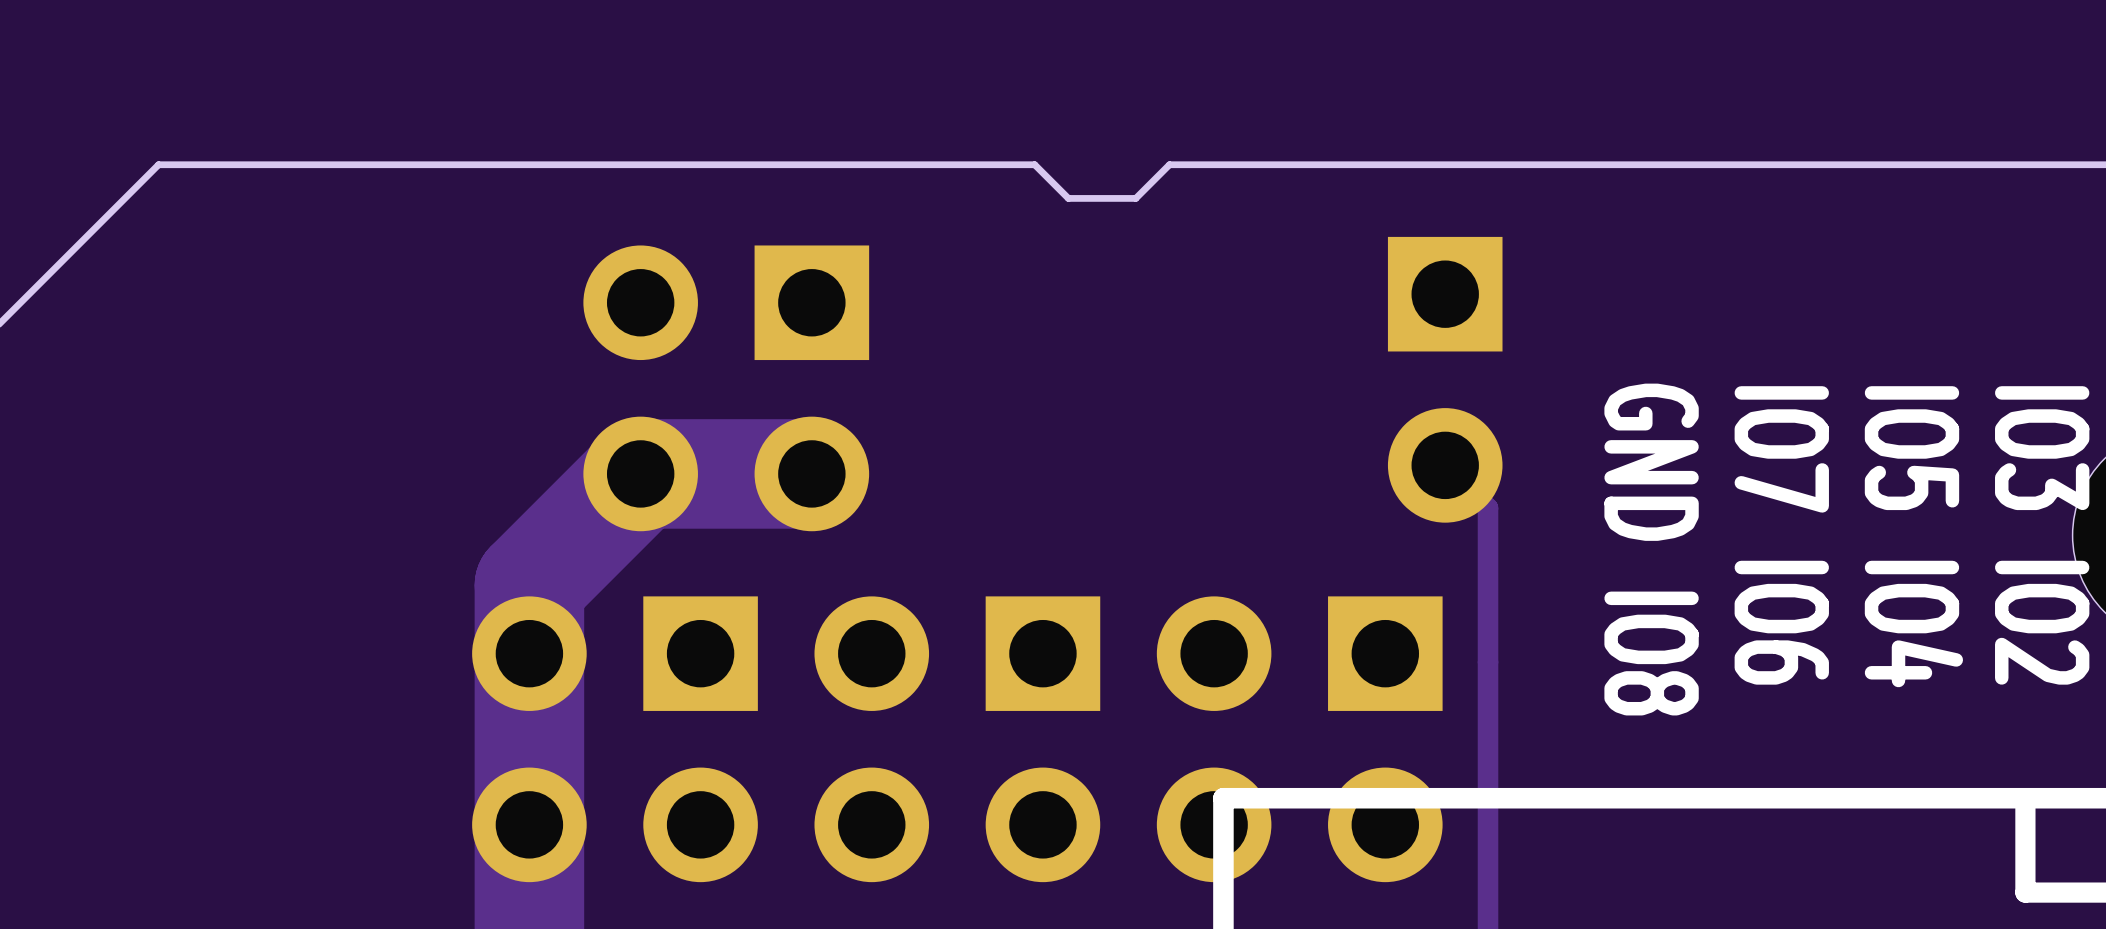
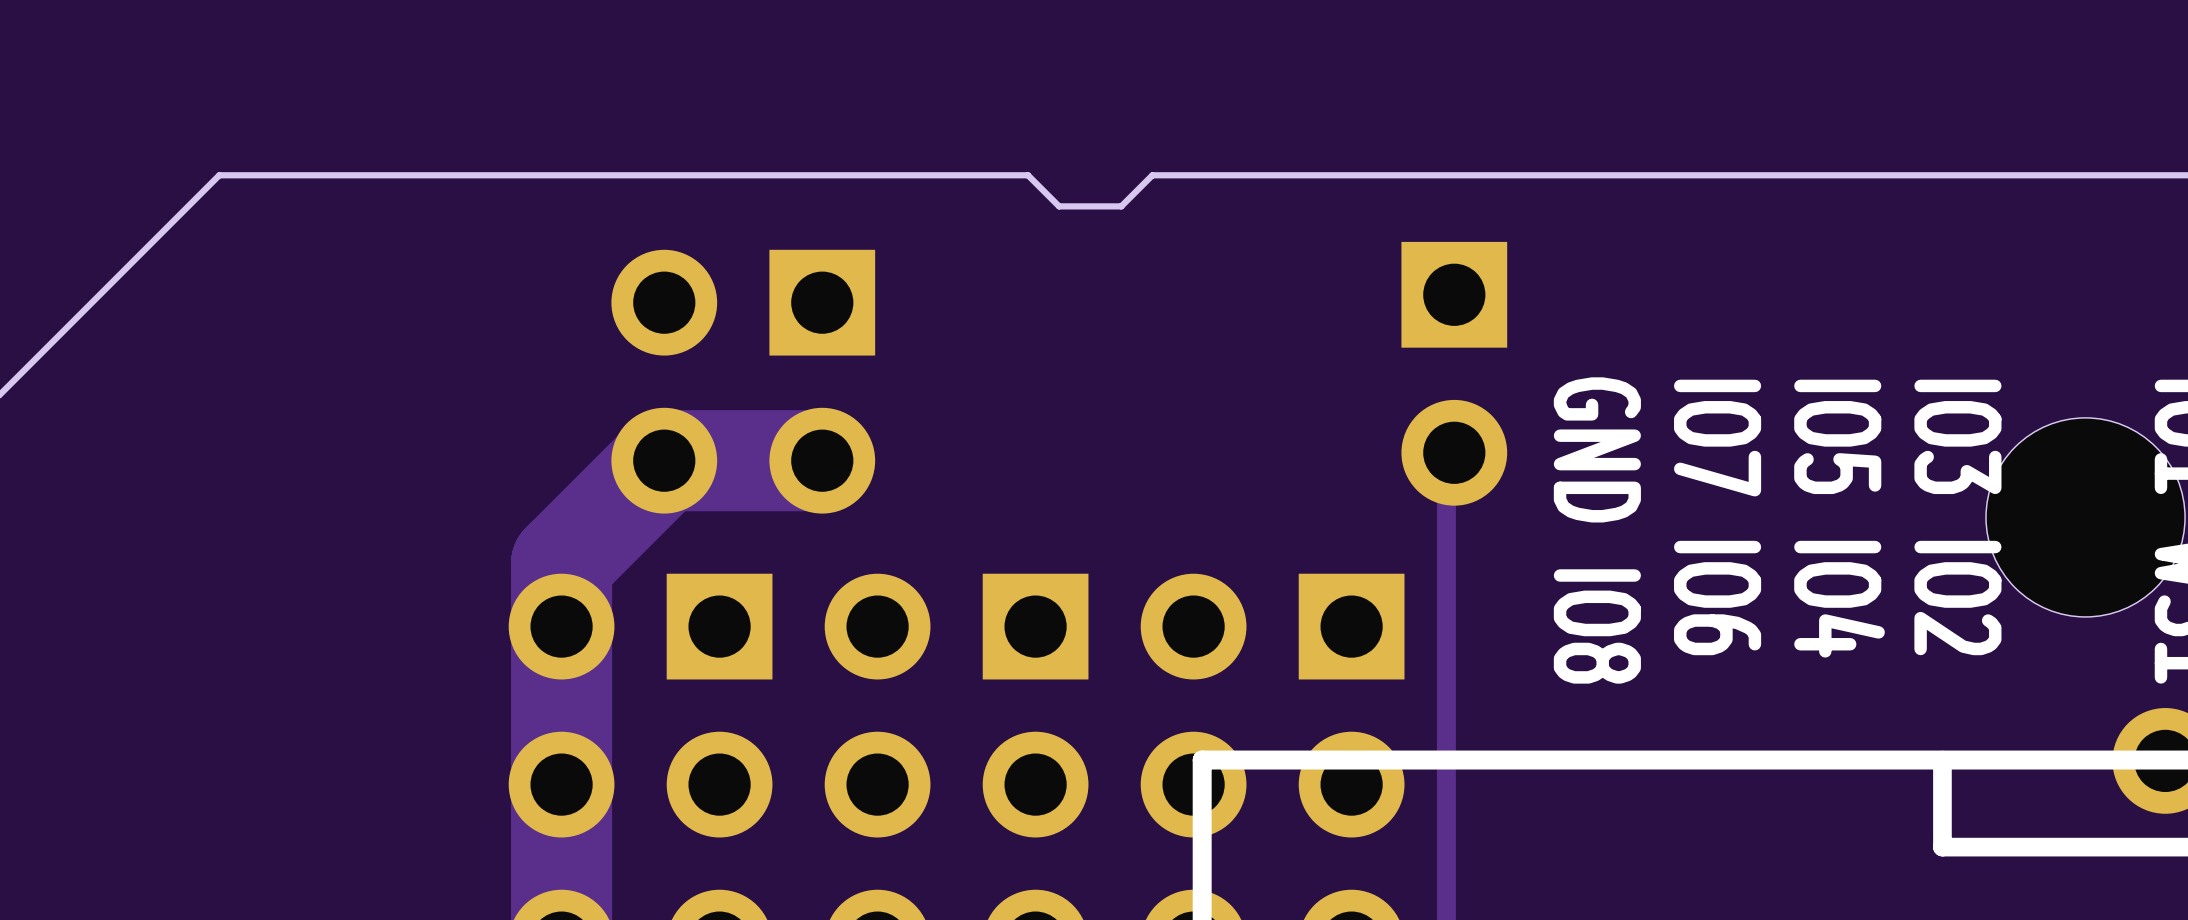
part position: (1445, 379) -> (1454, 373)

